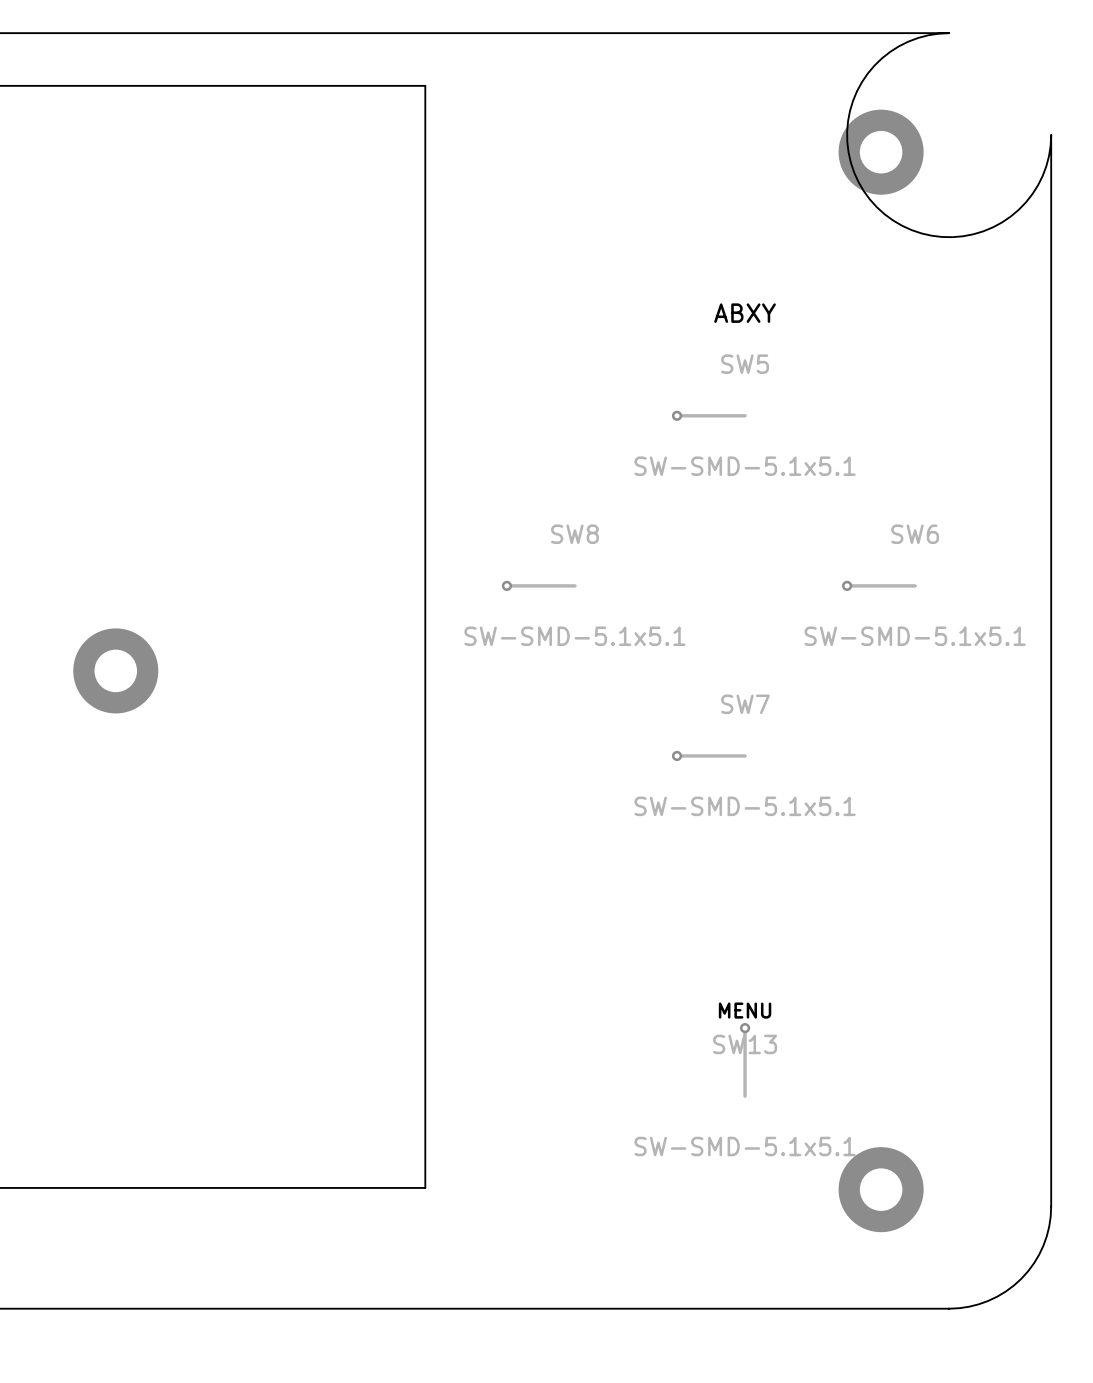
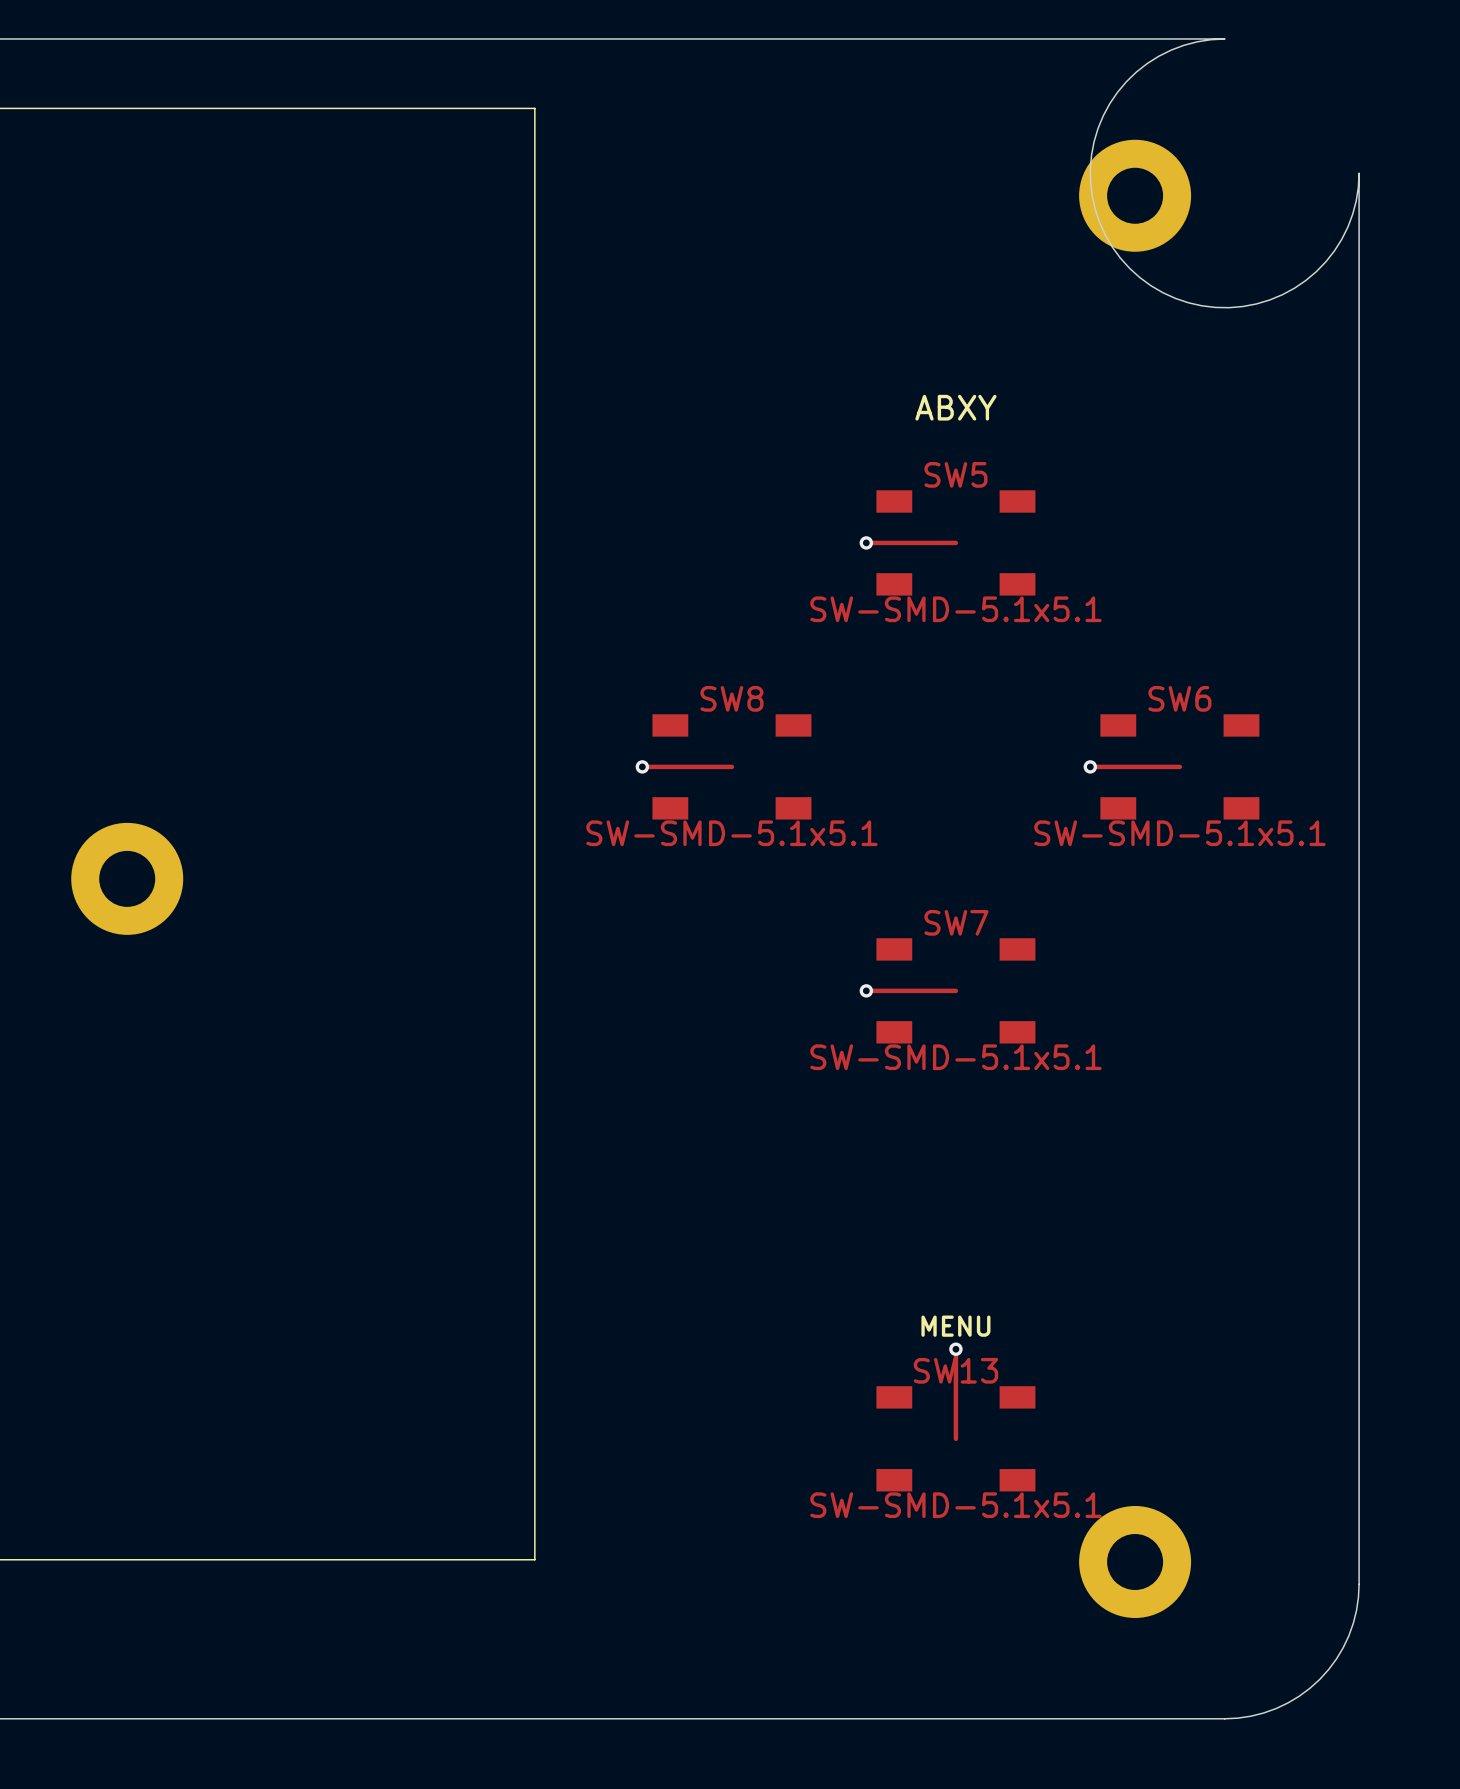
SW5 footprint: [634, 354, 856, 476] -> [876, 490, 1036, 596]
SW8 footprint: [464, 524, 686, 647] -> [652, 714, 812, 820]
SW6 footprint: [804, 524, 1026, 647] -> [1100, 714, 1260, 820]
SW7 footprint: [634, 694, 856, 817] -> [876, 938, 1036, 1044]
SW13 footprint: [634, 1034, 856, 1157] -> [876, 1386, 1036, 1492]

